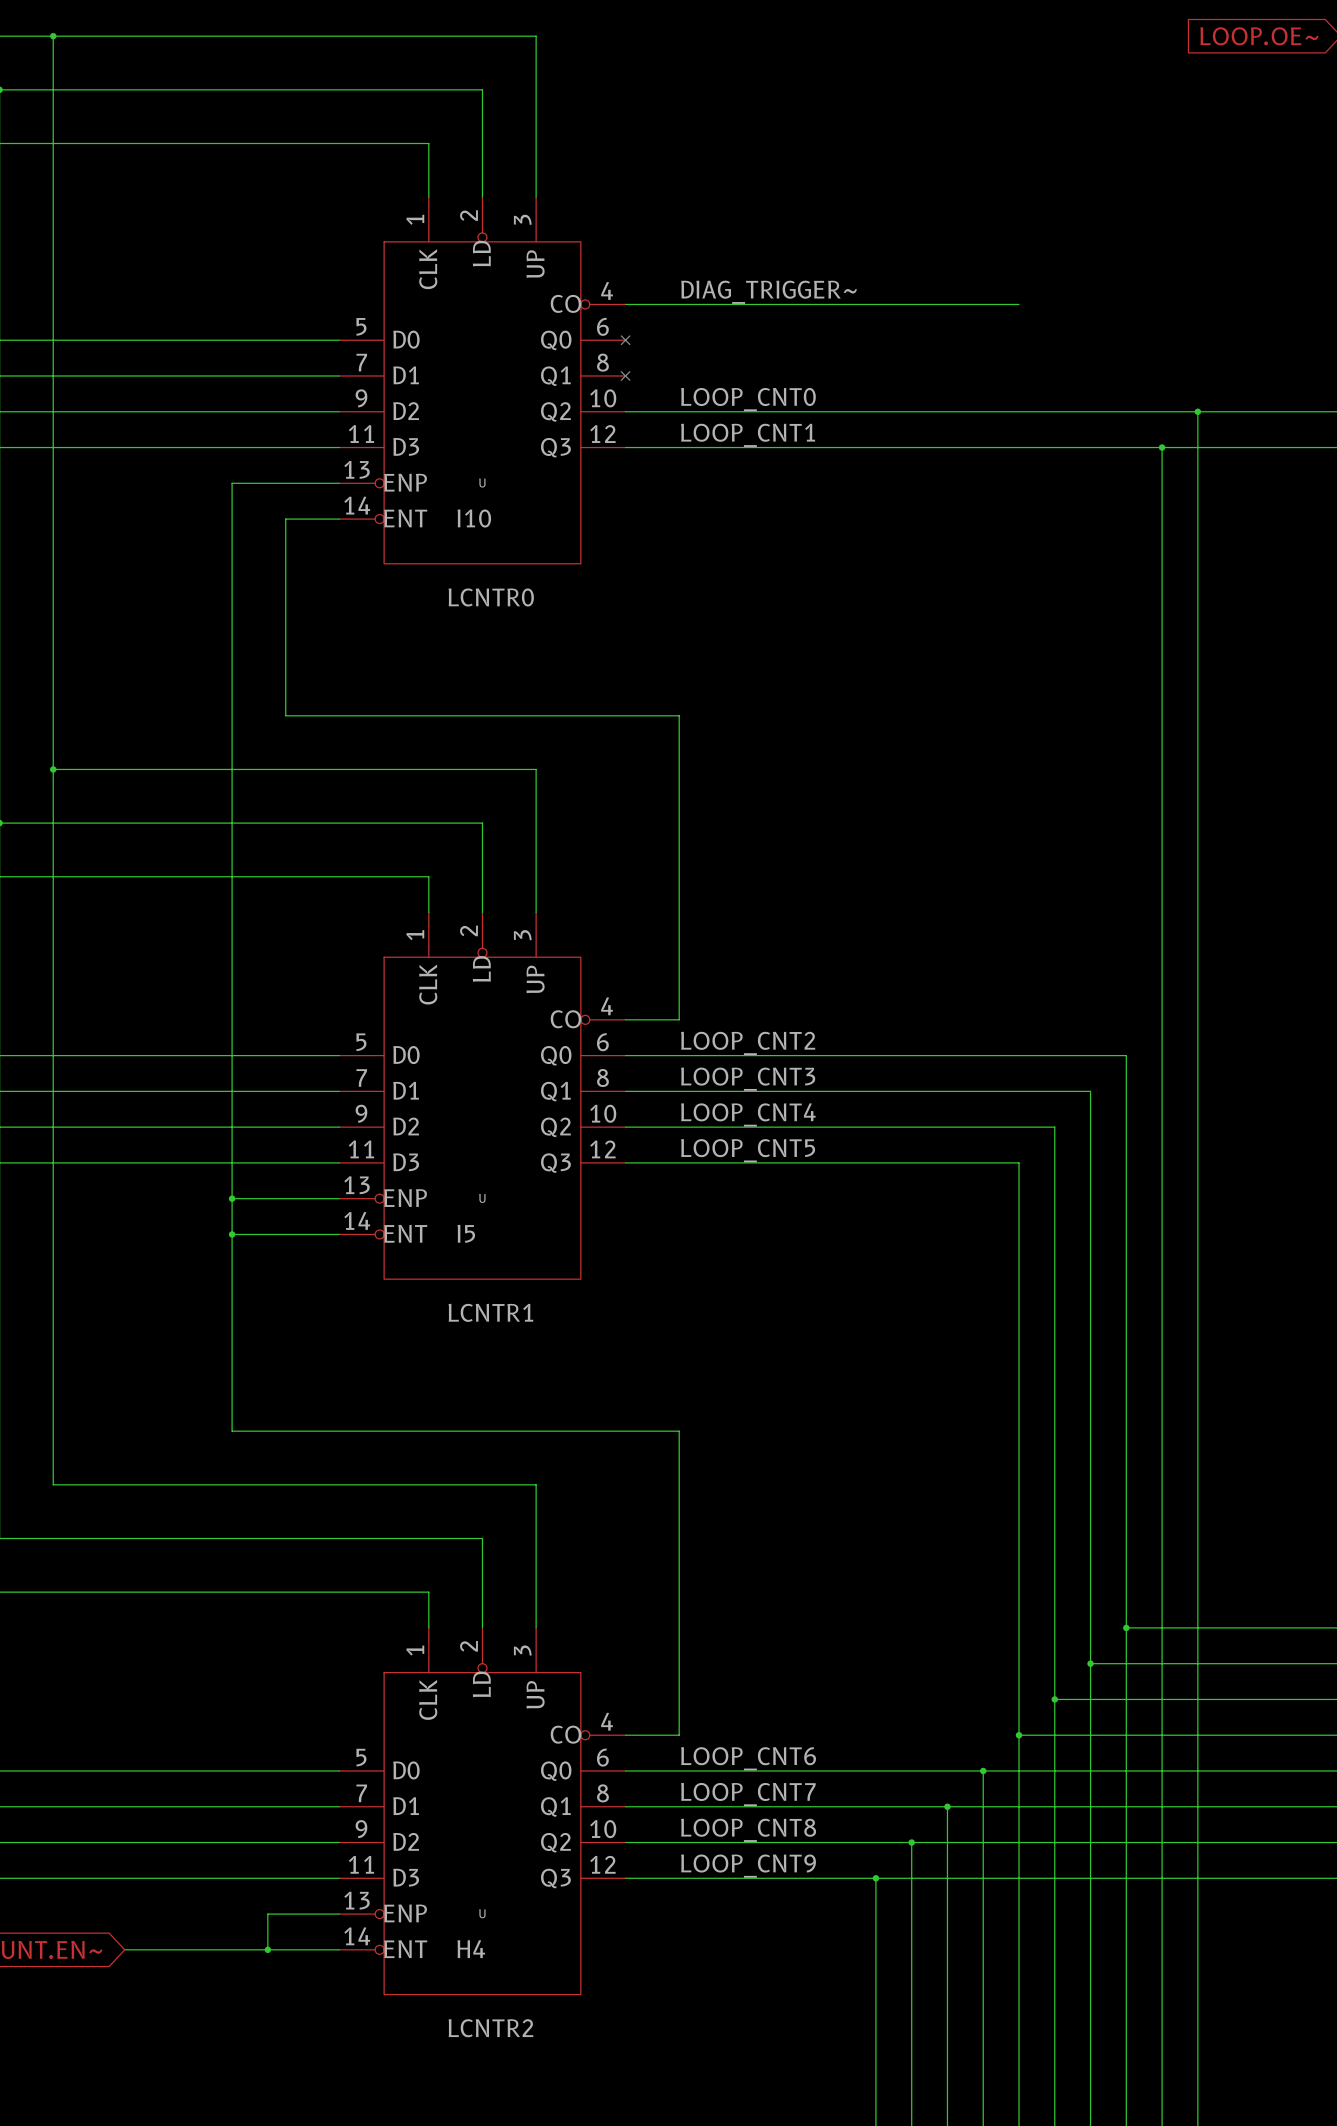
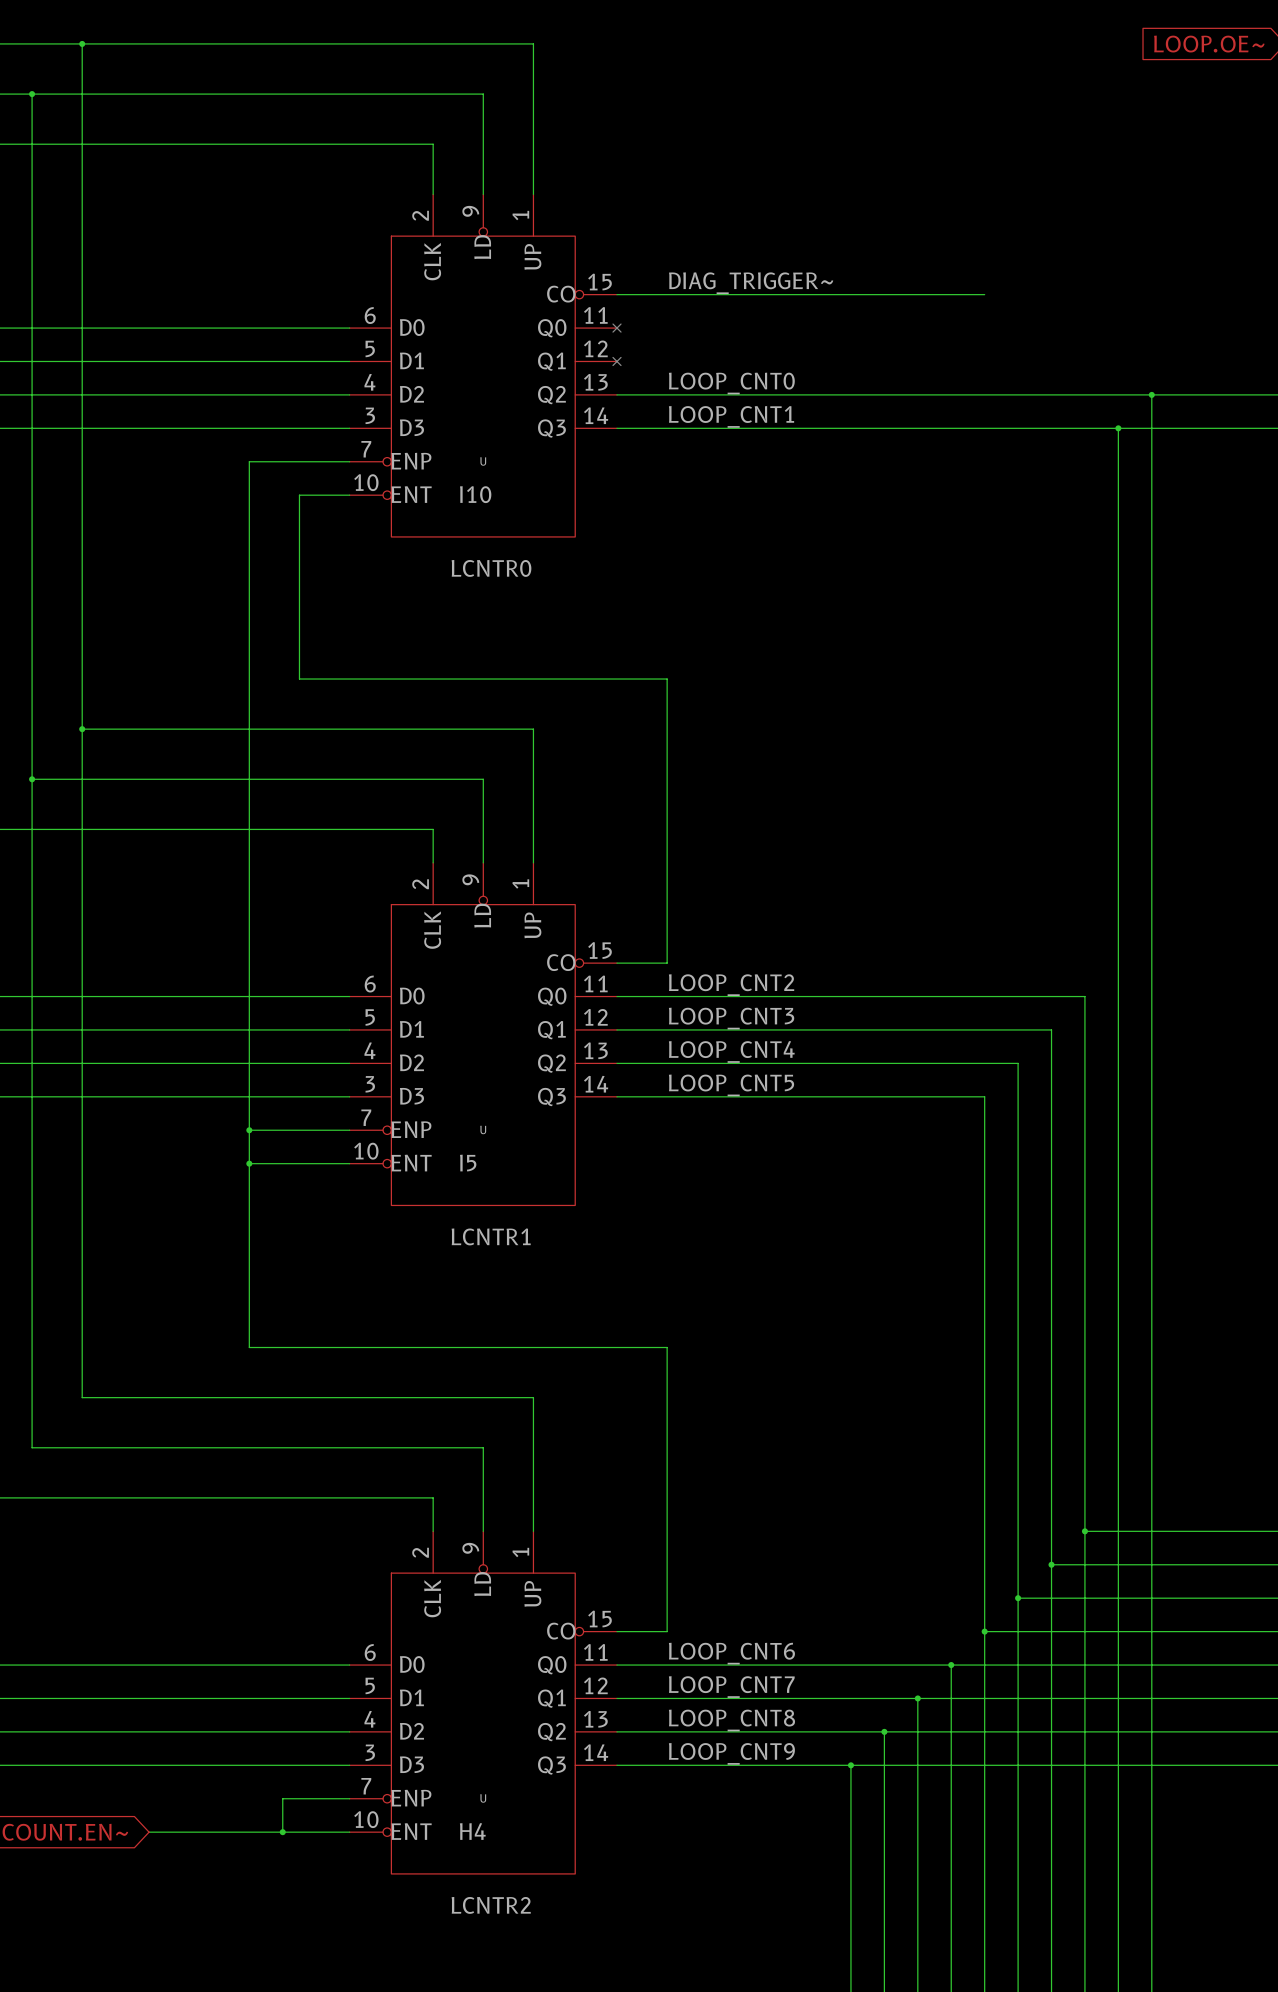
U symbol: [339, 197, 626, 564] -> [349, 194, 618, 537]
U symbol: [339, 912, 626, 1280] -> [349, 862, 618, 1206]
U symbol: [339, 1627, 626, 1995] -> [349, 1531, 618, 1874]

